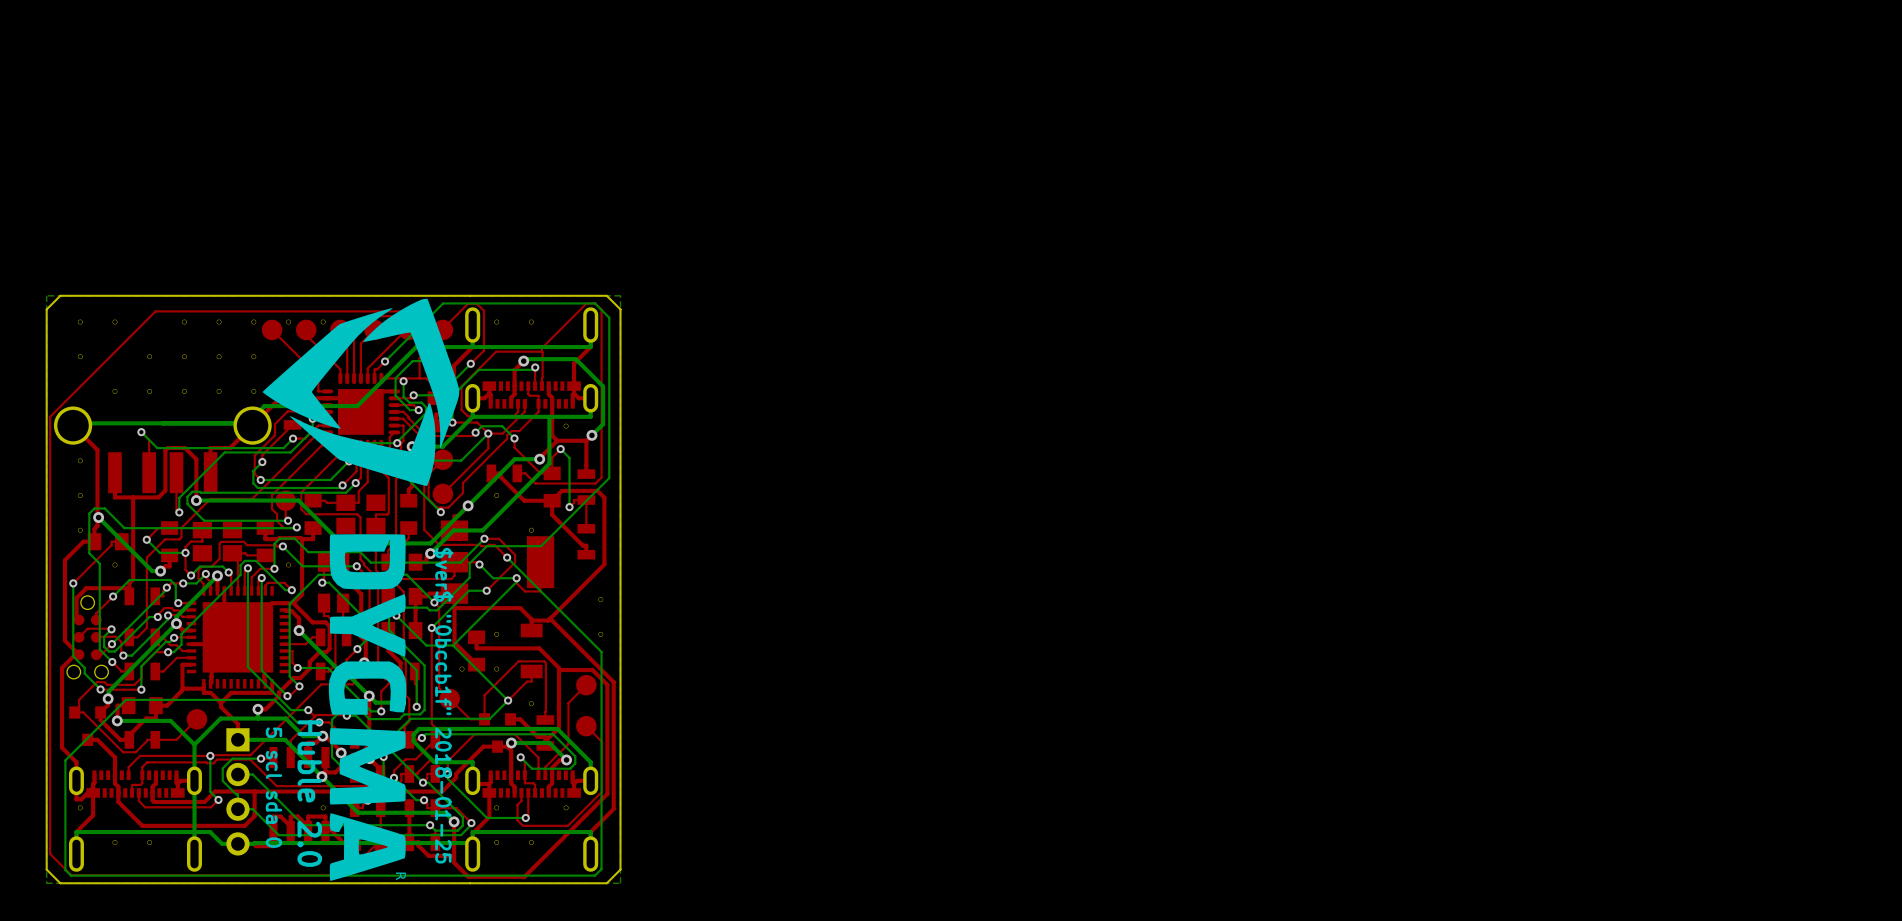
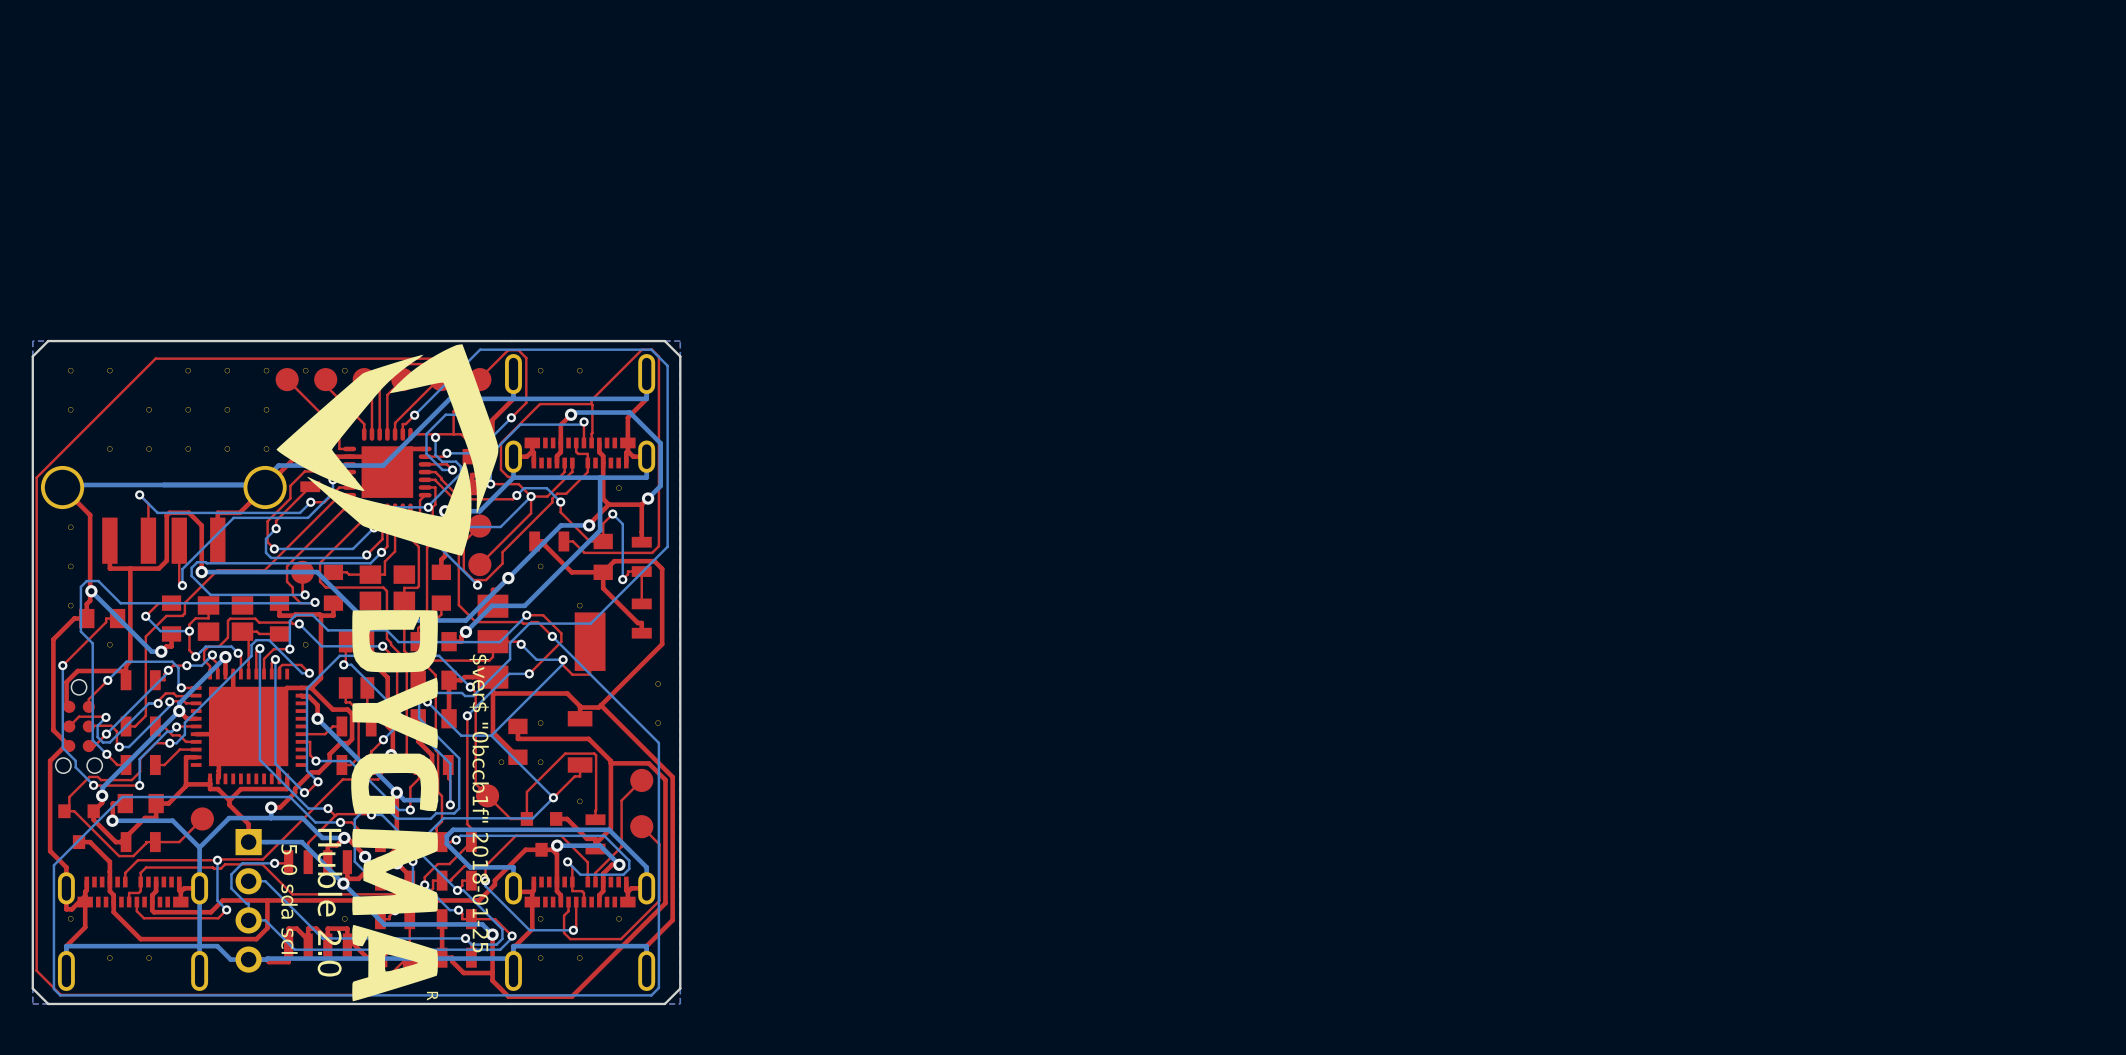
text: 5 scl sda 0 (273, 787) -> 5 0 sda scl (289, 899)

